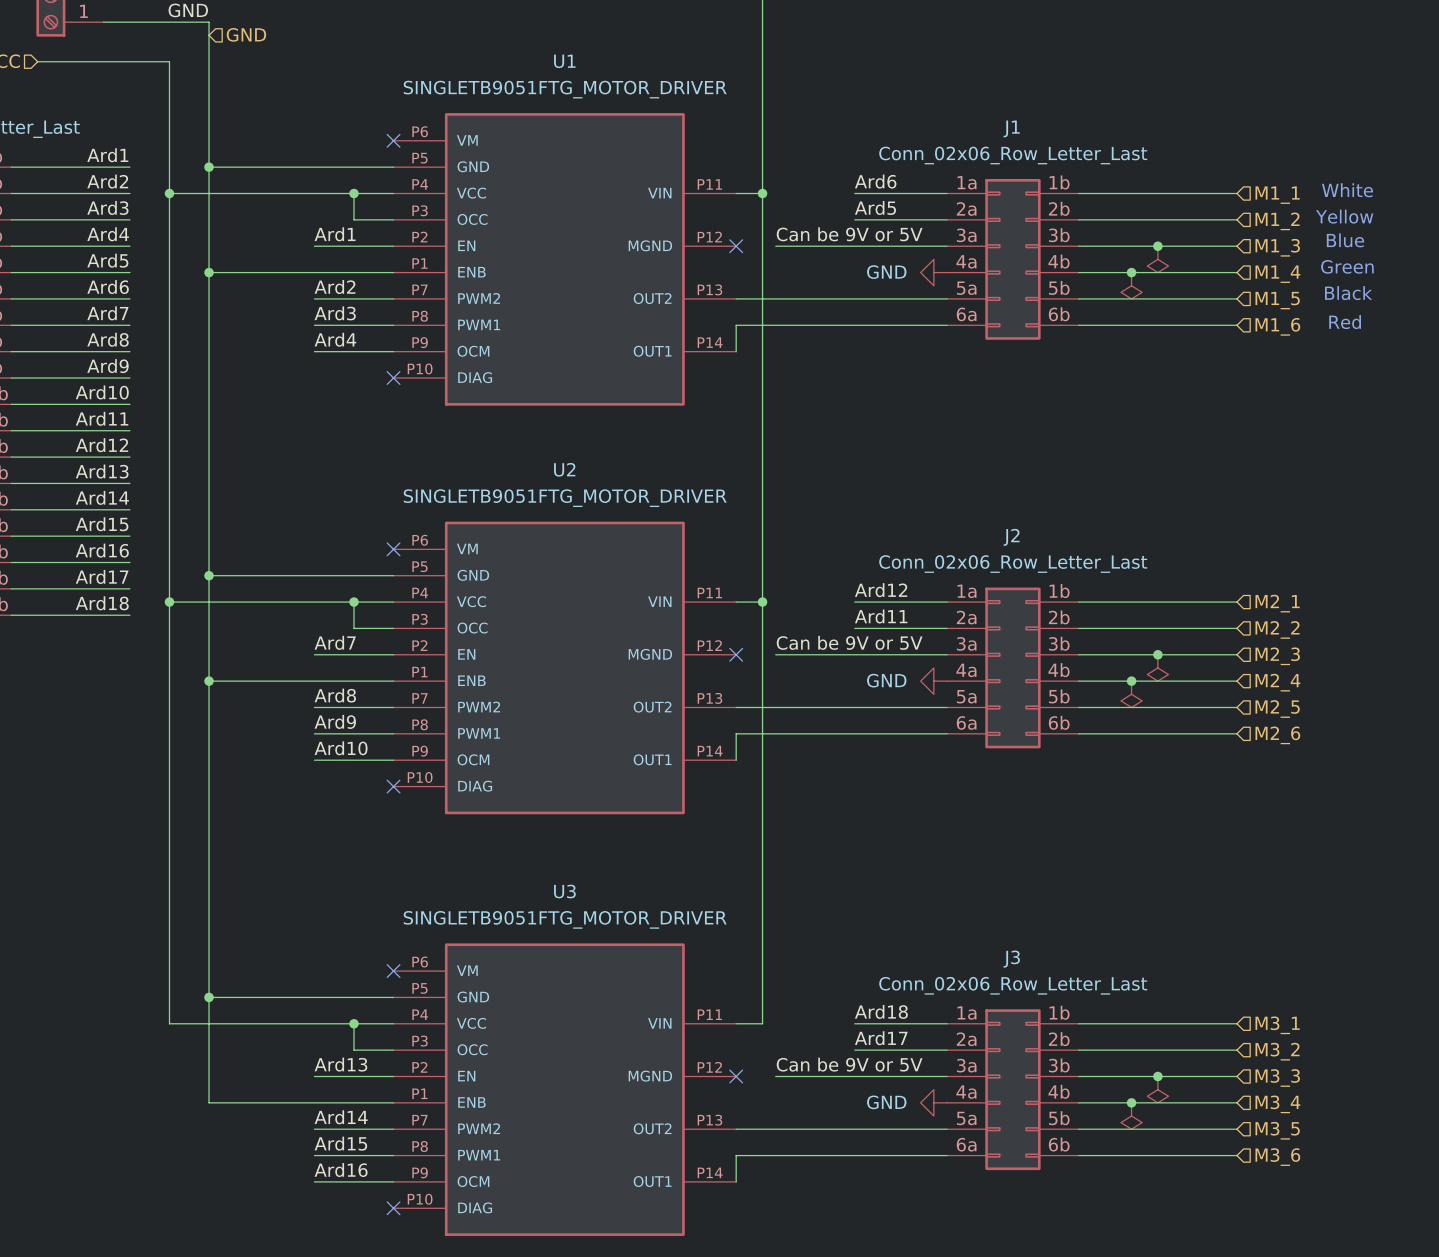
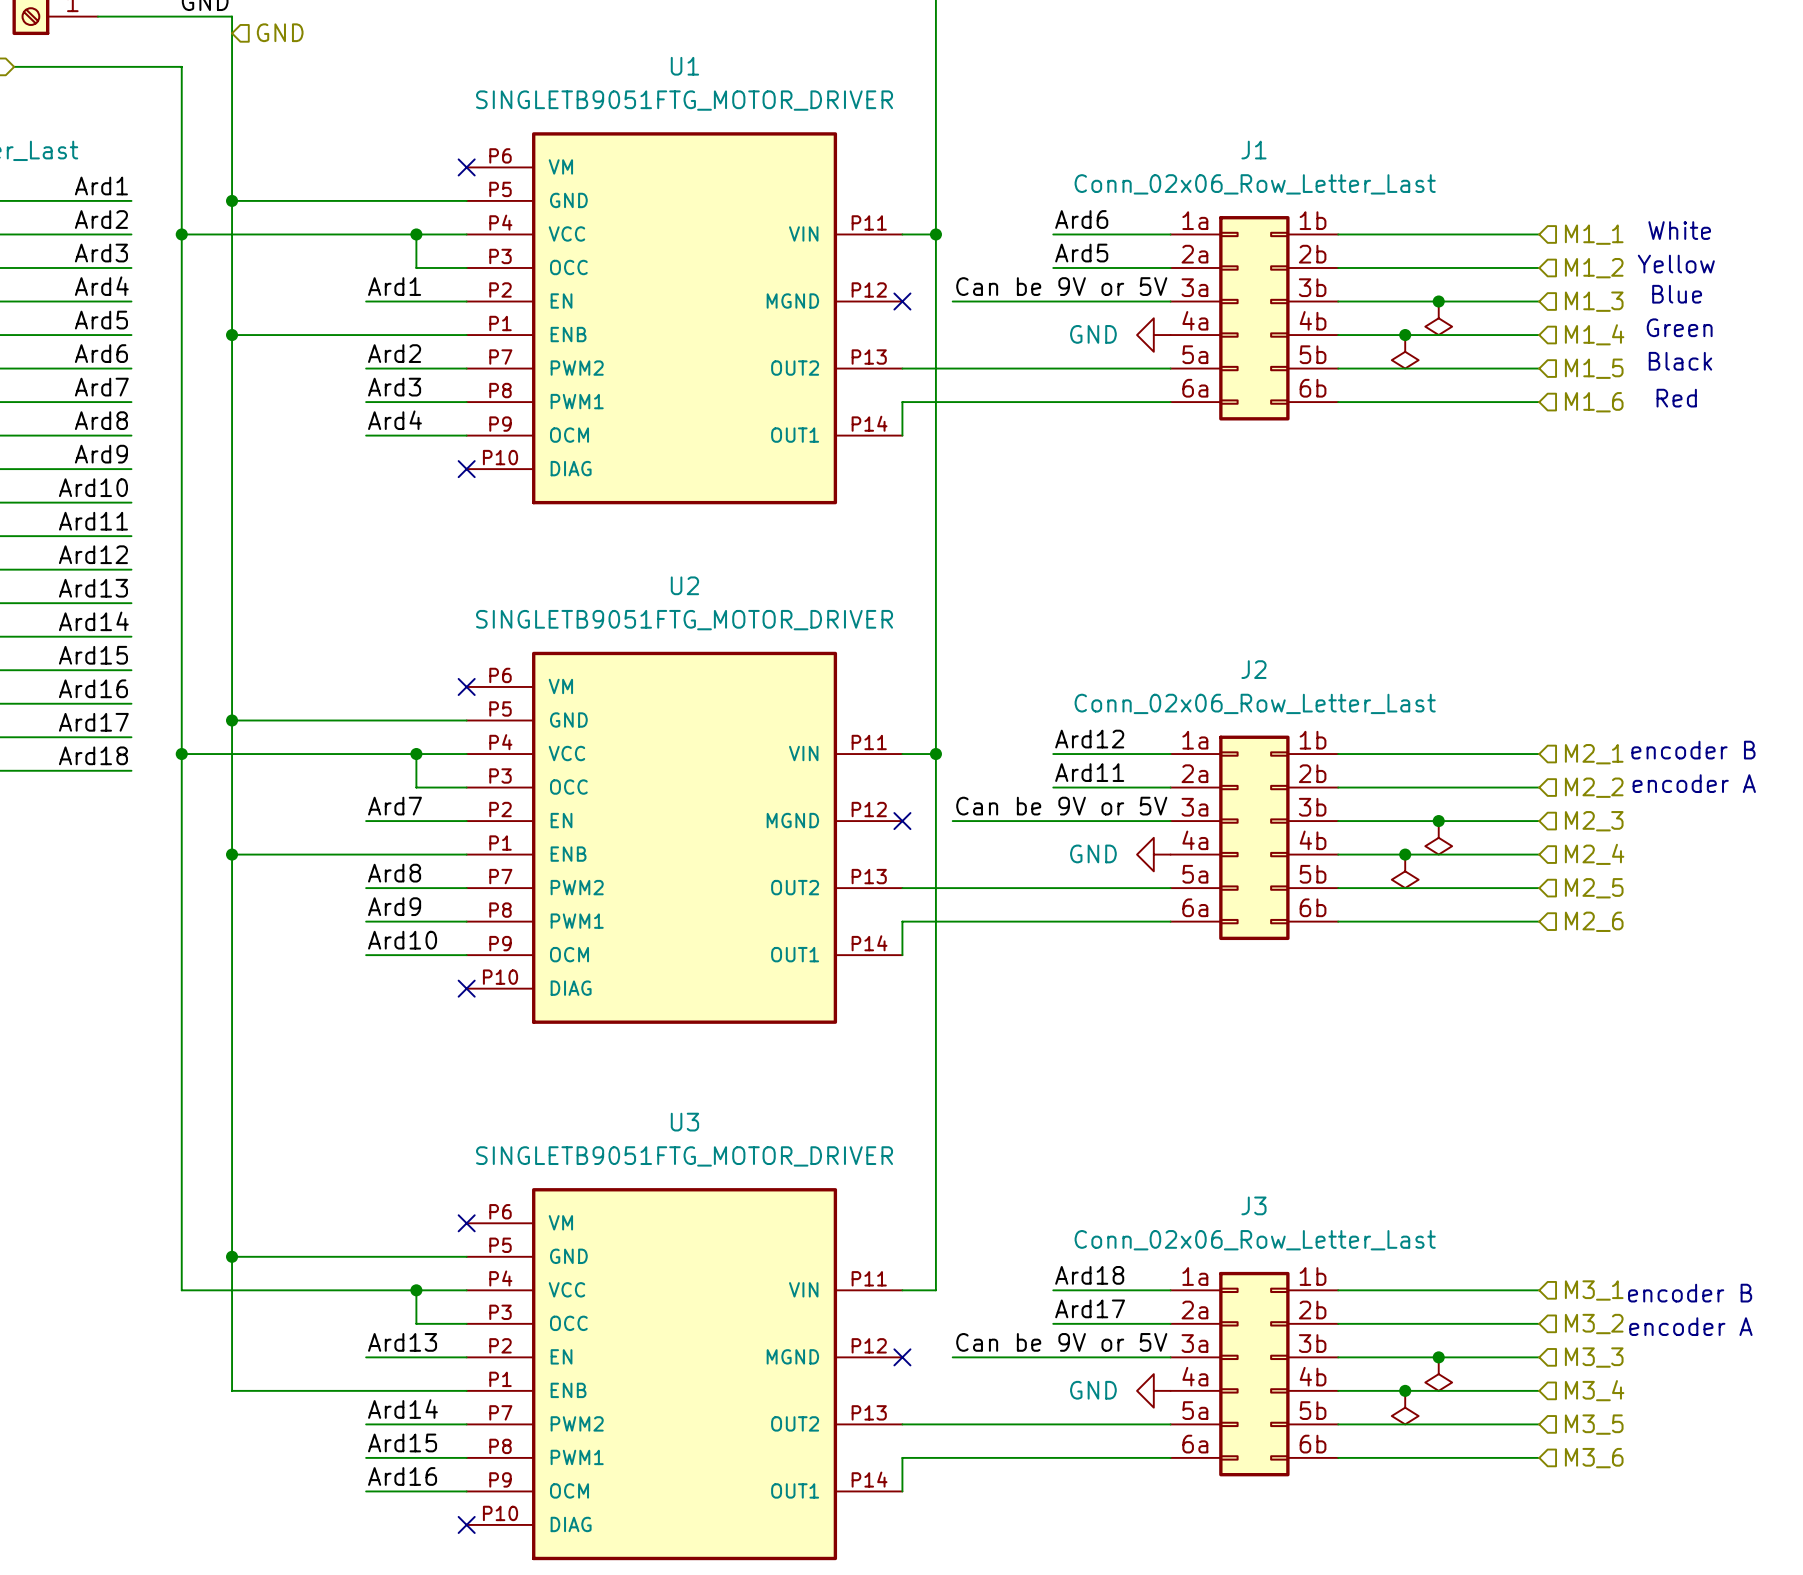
text: none -> encoder B (1693, 750)
text: none -> encoder A (1694, 783)
text: none -> encoder B (1690, 1293)
text: none -> encoder A (1690, 1326)

